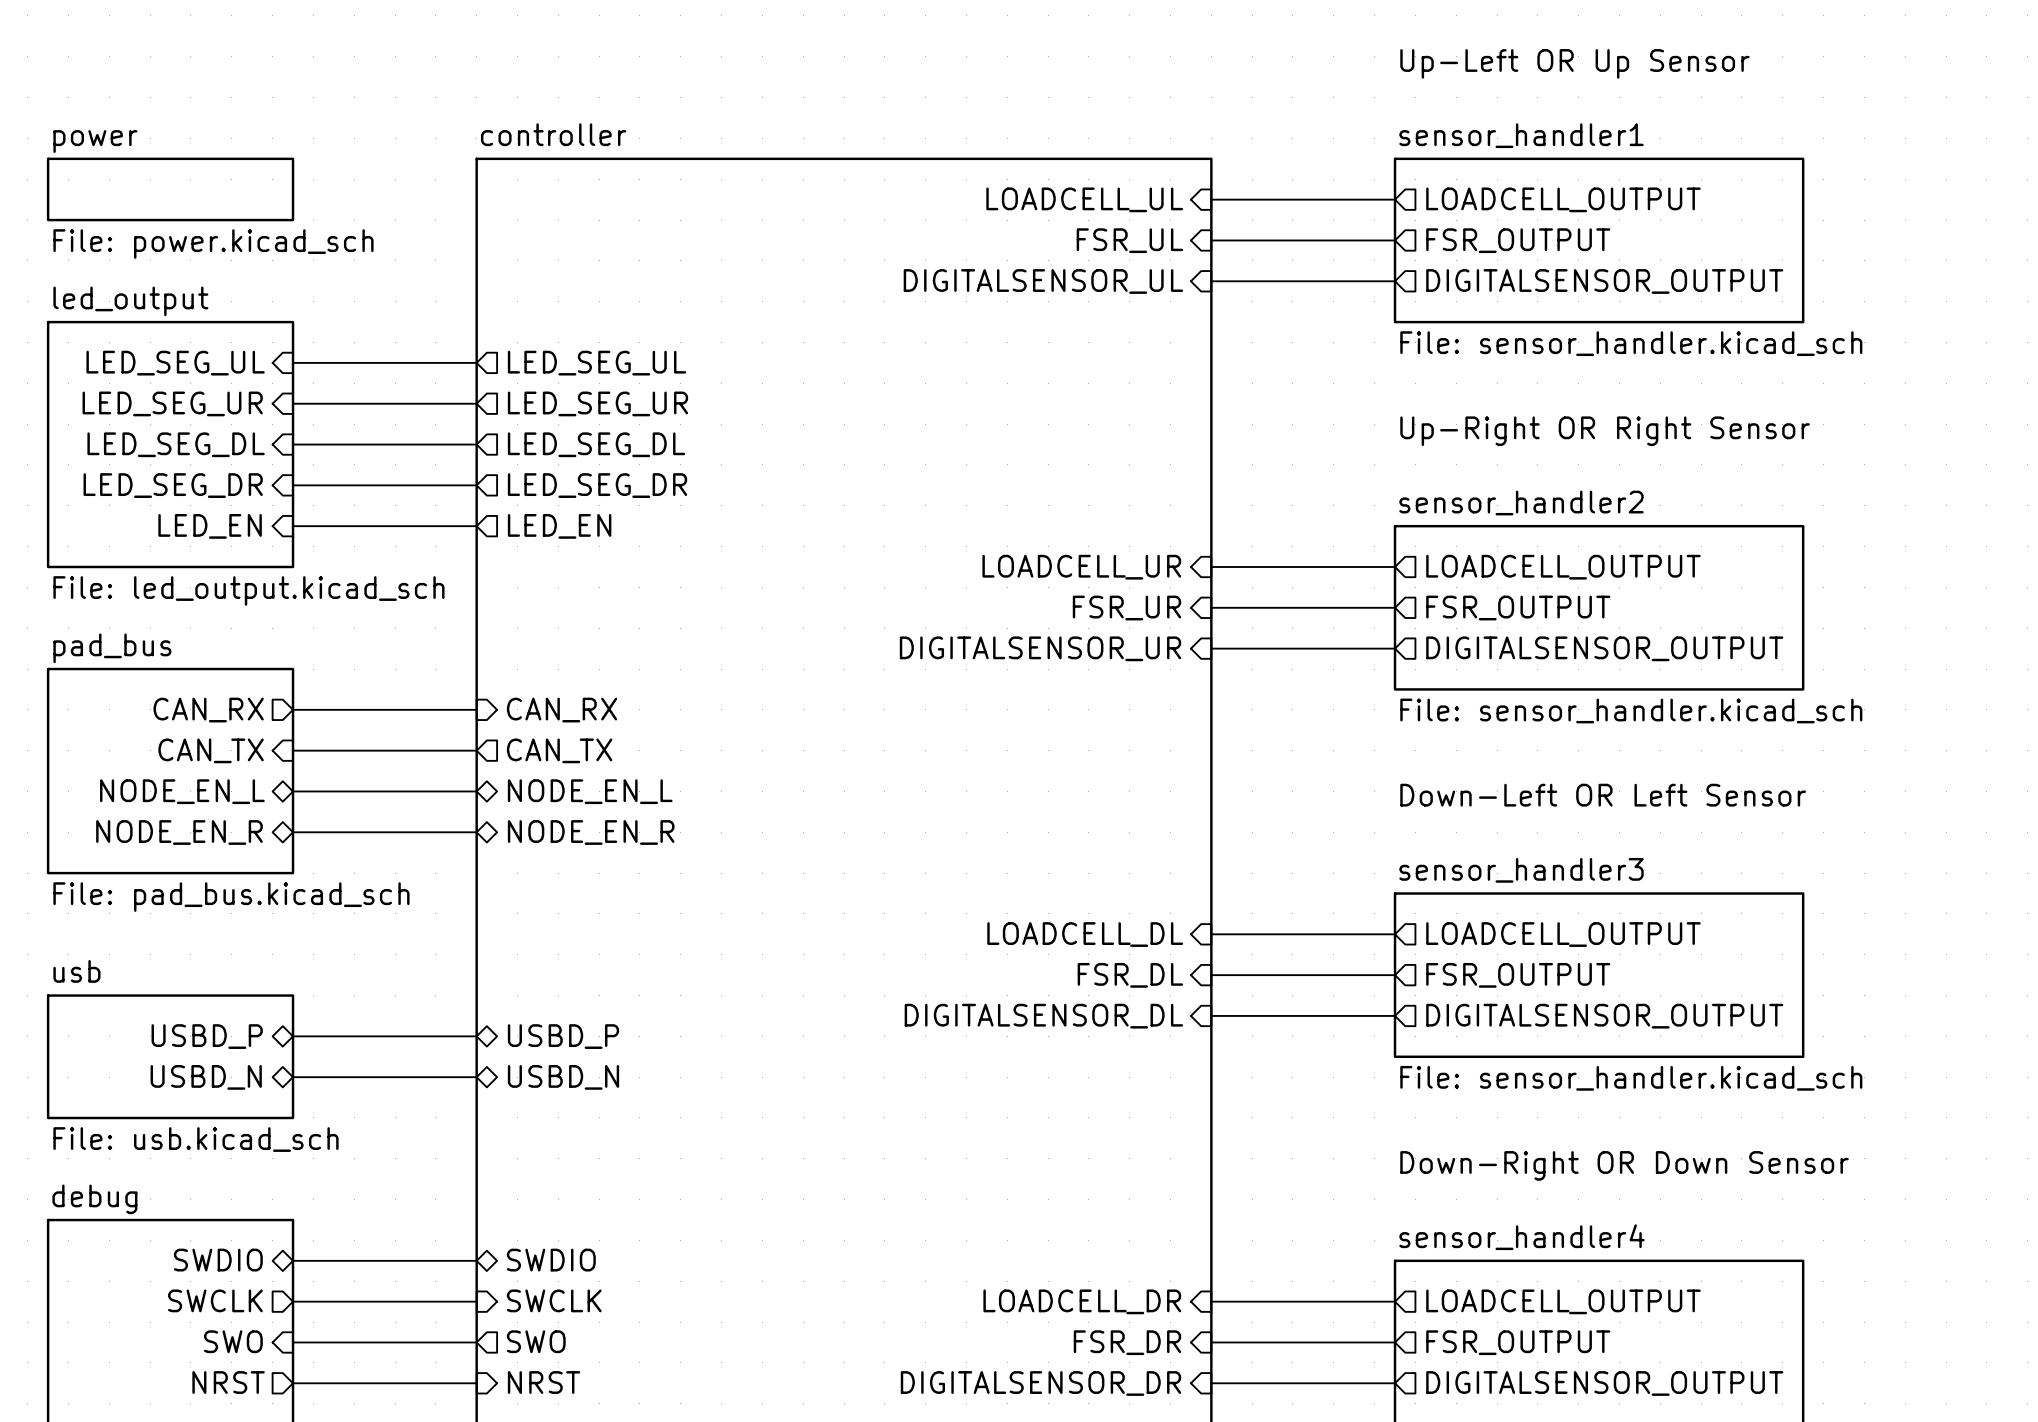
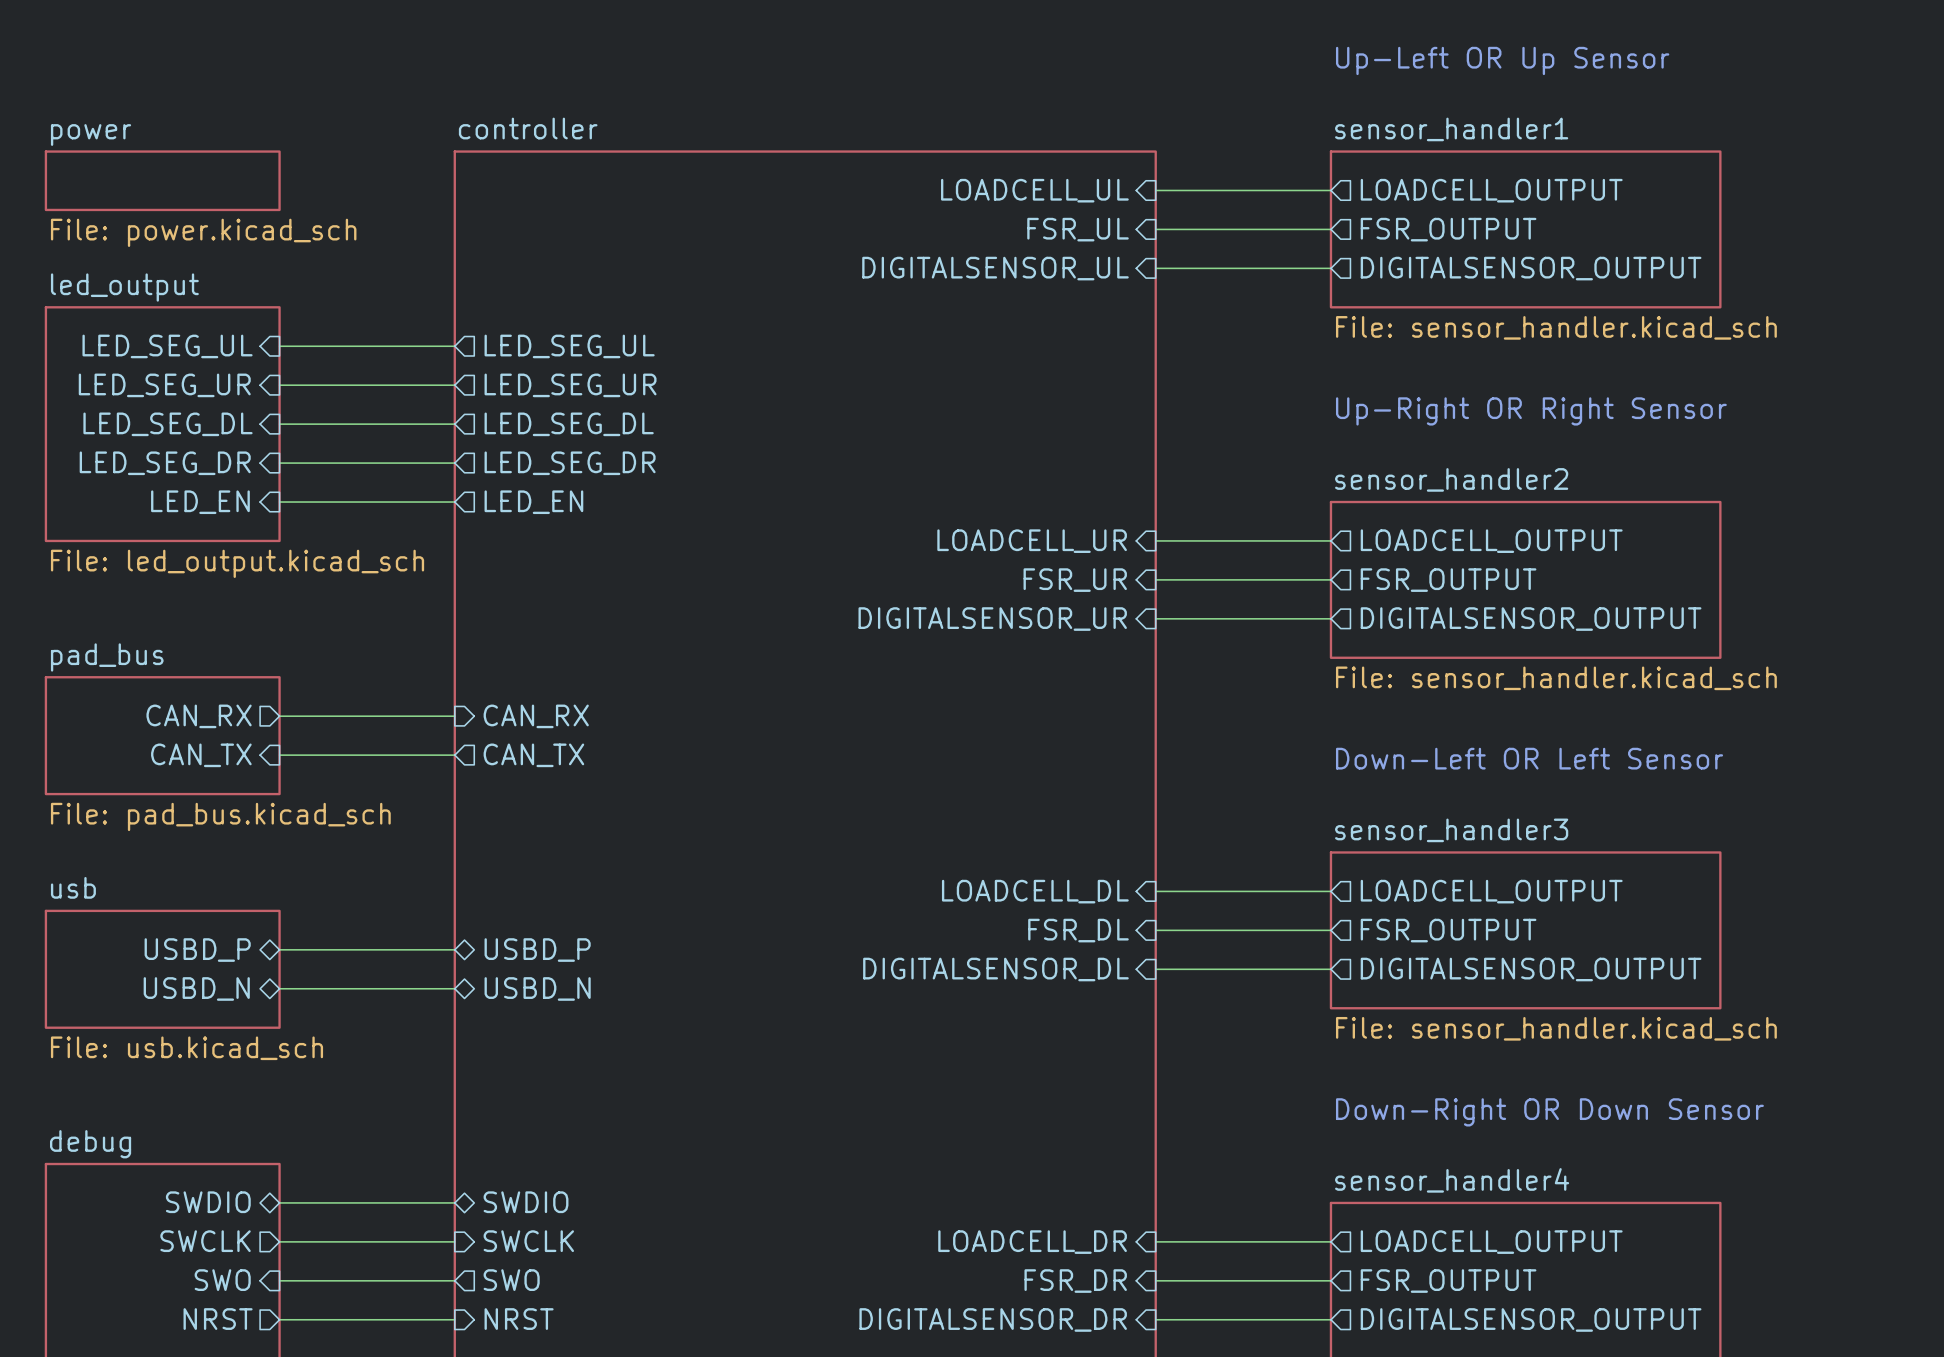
sheet pad_bus name position: pad_bus (112, 648) -> pad_bus (107, 657)
sheet pad_bus shape: [46, 667, 295, 875] -> [44, 676, 281, 796]
wire: (293, 709) (476, 709) -> none
sheet pin: CAN_RX (208, 710) -> none
sheet pin: CAN_RX (562, 710) -> none
sheet pin shape: input (211, 750) -> output (199, 716)
sheet pin: CAN_TX (211, 750) -> CAN_RX (199, 716)
sheet pin shape: output (559, 750) -> input (536, 716)
sheet pin: CAN_TX (559, 750) -> CAN_RX (536, 716)
sheet pin shape: bidirectional (182, 791) -> input (201, 755)
sheet pin: NODE_EN_L (182, 791) -> CAN_TX (201, 755)
sheet pin shape: bidirectional (590, 791) -> output (533, 755)
sheet pin: NODE_EN_L (590, 791) -> CAN_TX (533, 755)
sheet pin: NODE_EN_R (179, 832) -> none
wire: (293, 832) (476, 832) -> none
sheet pin: NODE_EN_R (591, 832) -> none
sheet pad_bus value position: File: pad_bus.kicad_sch (231, 897) -> File: pad_bus.kicad_sch (220, 816)
sheet pin: none -> USBD_P (197, 950)
sheet pin: none -> USBD_P (537, 950)
sheet pin: USBD_P (207, 1036) -> USBD_N (196, 988)
sheet pin: USBD_P (563, 1036) -> USBD_N (537, 988)
sheet usb position: (170, 1056) -> (162, 969)
sheet pin: USBD_N (206, 1077) -> none
wire: (293, 1077) (476, 1077) -> (279, 949) (454, 949)
sheet pin: USBD_N (563, 1077) -> none

